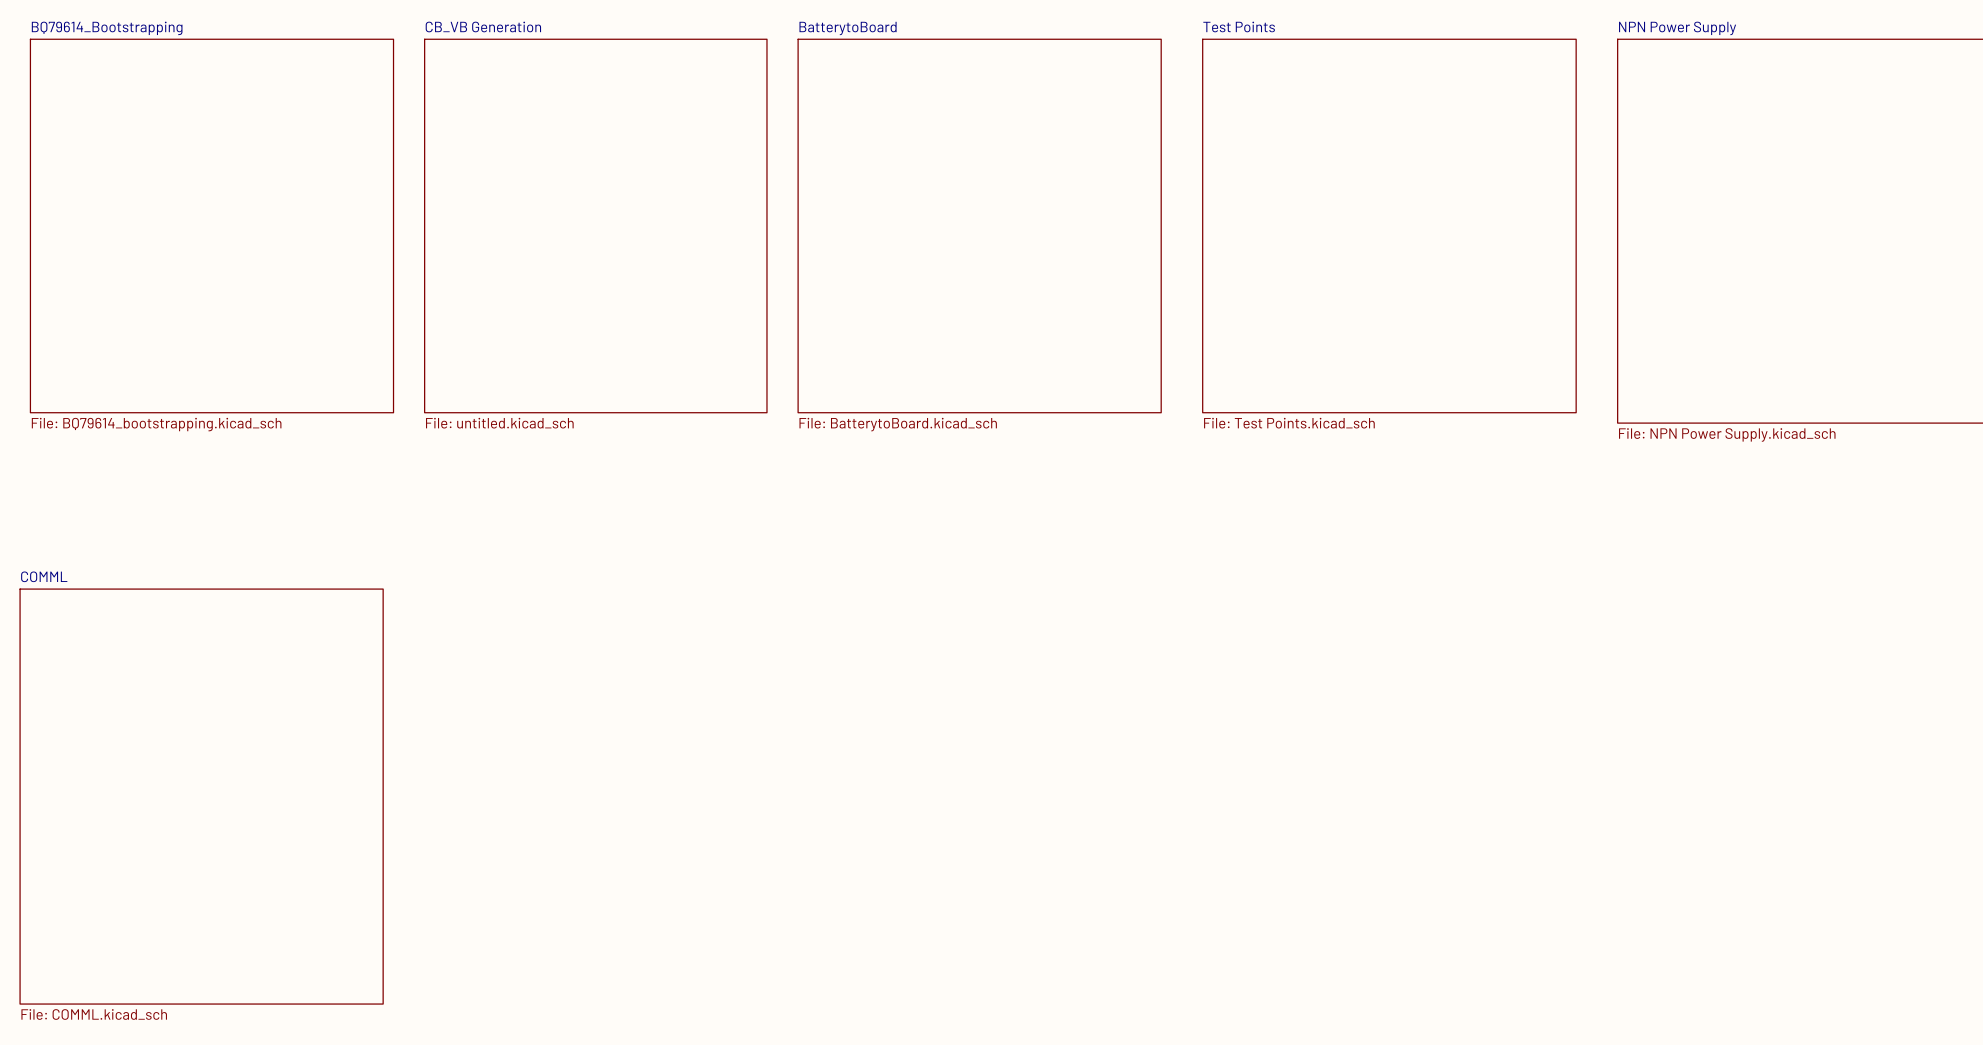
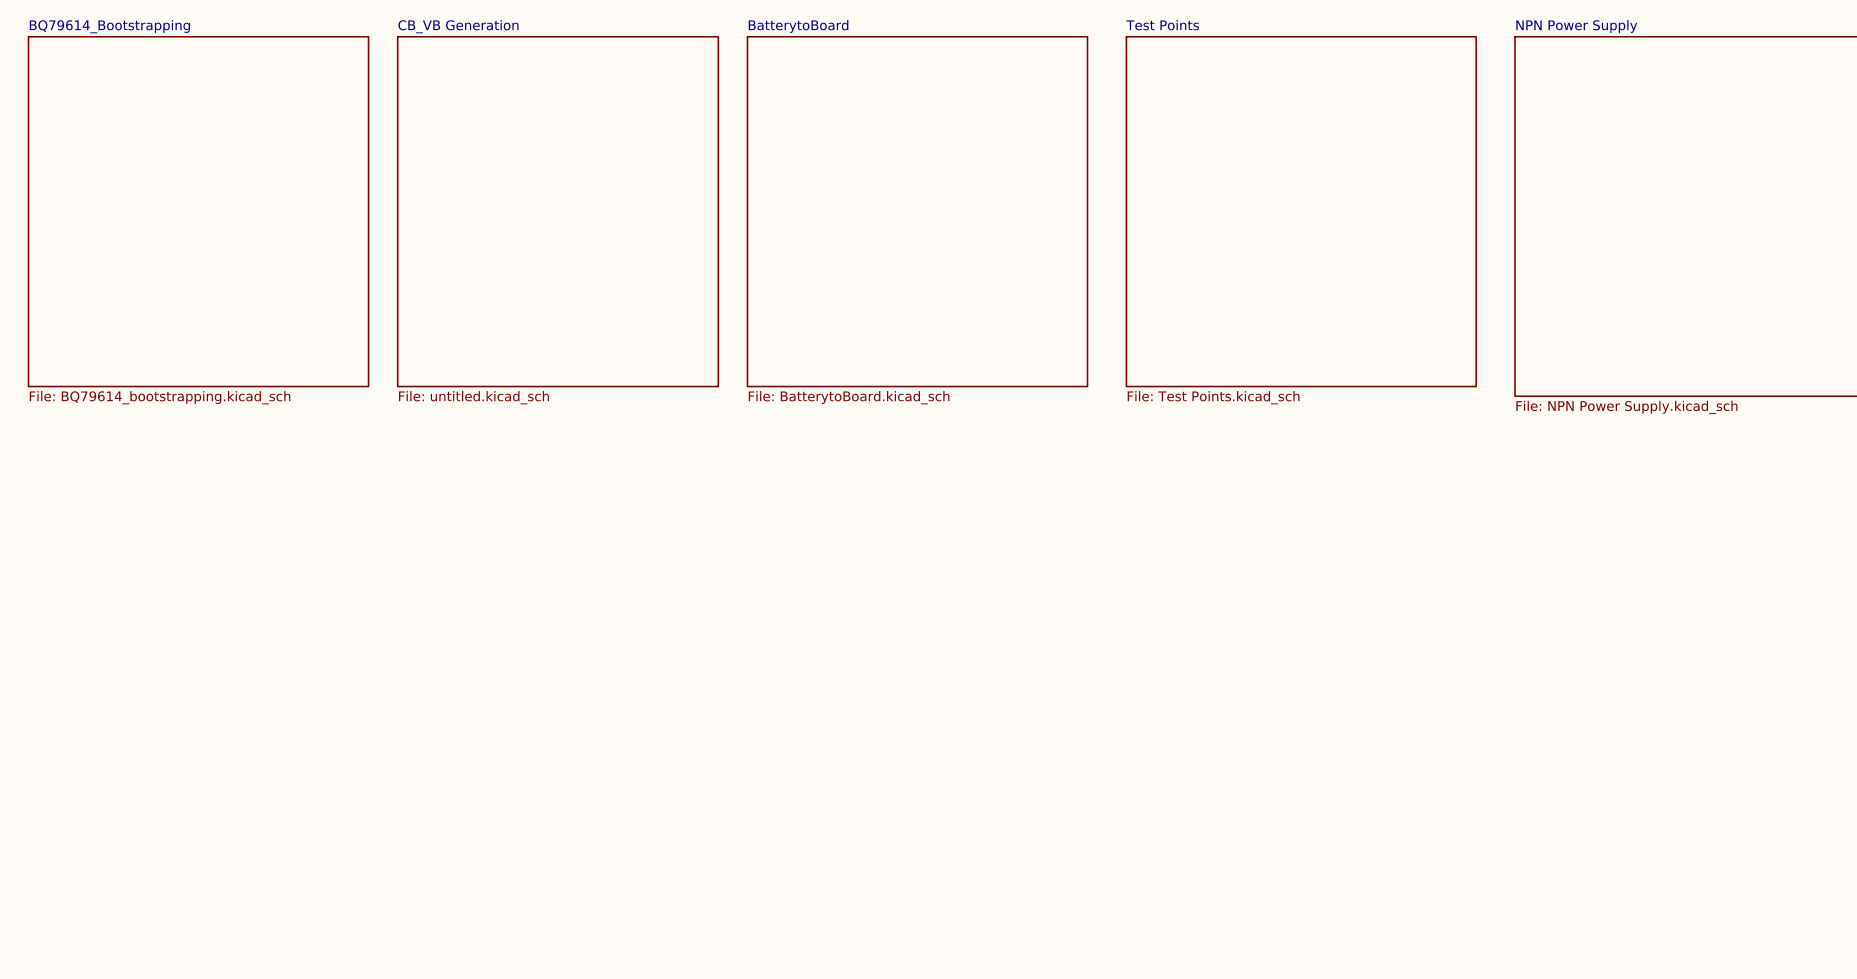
sheet COMML: File: COMML.kicad_sch (201, 796) -> none

